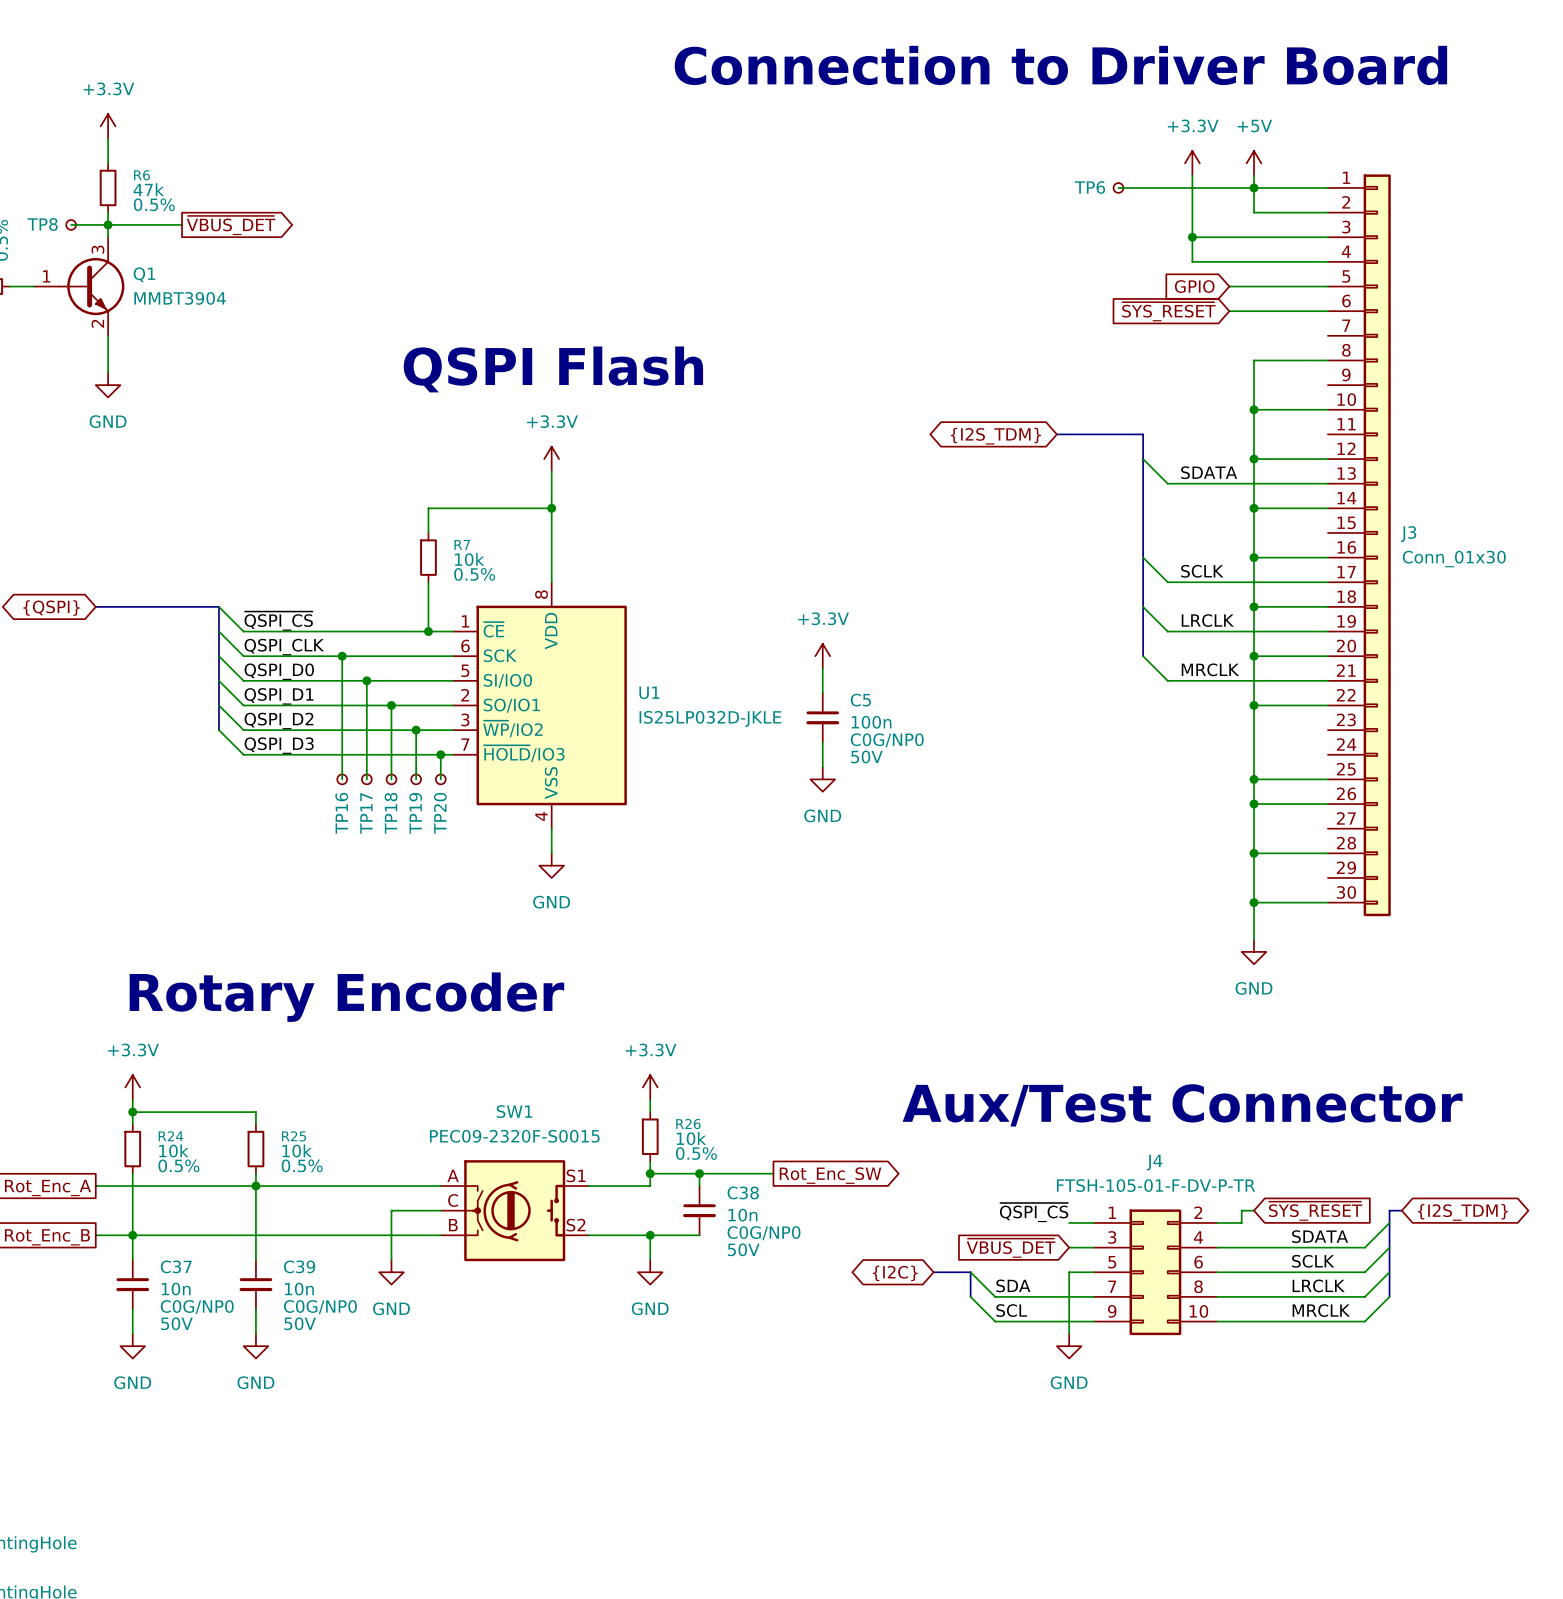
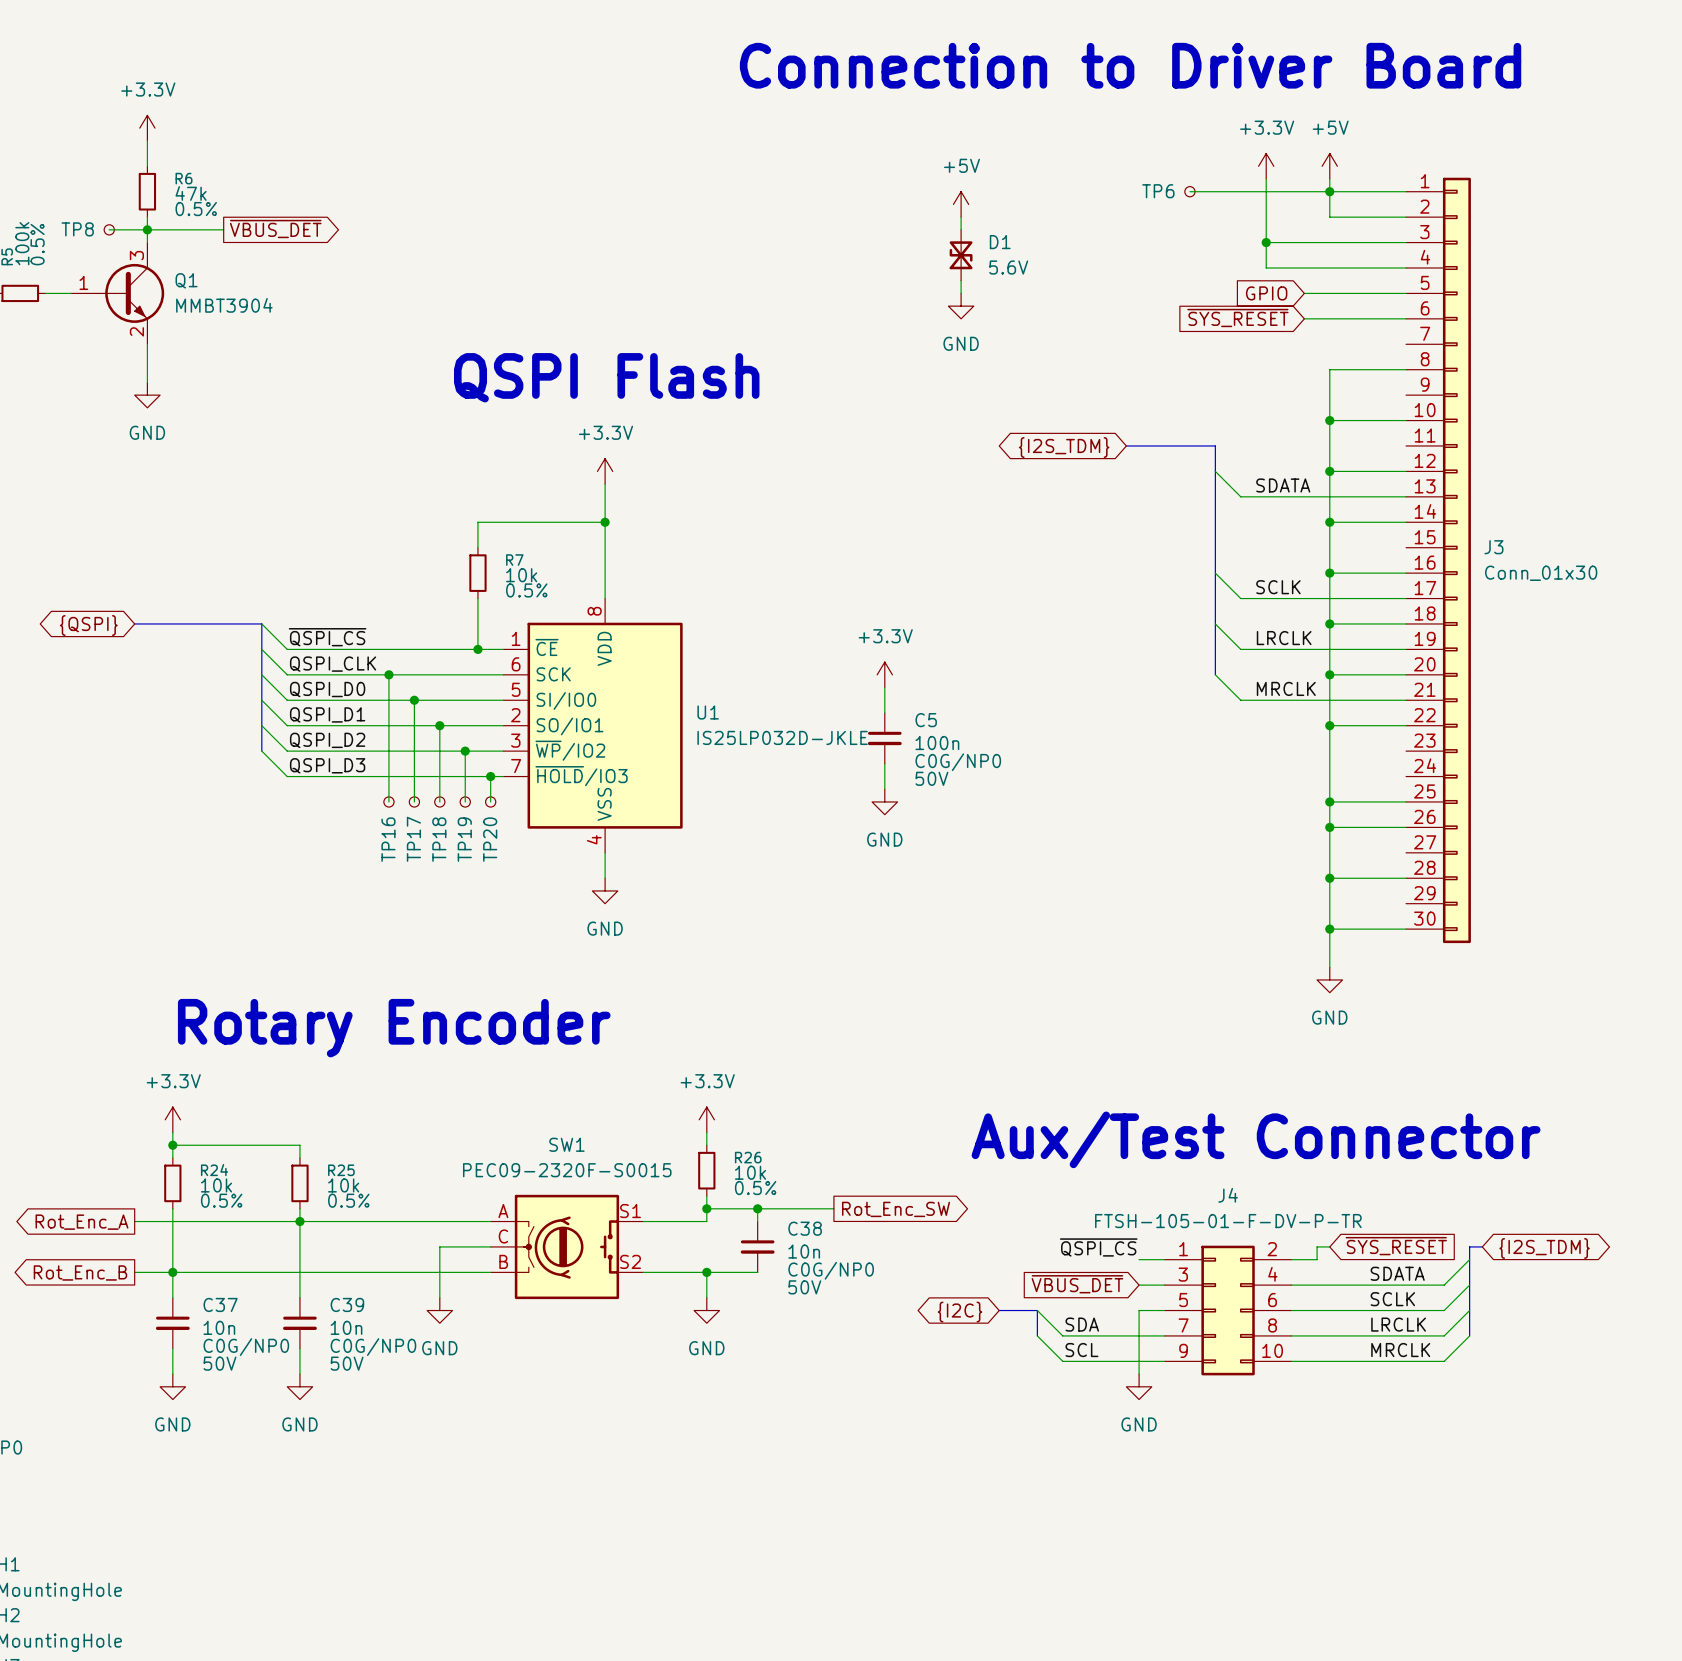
power symbol: none -> +5V (961, 204)
wire: none -> (961, 217) (961, 229)
D1: none -> 5.6V (961, 255)
wire: none -> (961, 280) (961, 293)
power symbol: none -> GND (961, 306)

